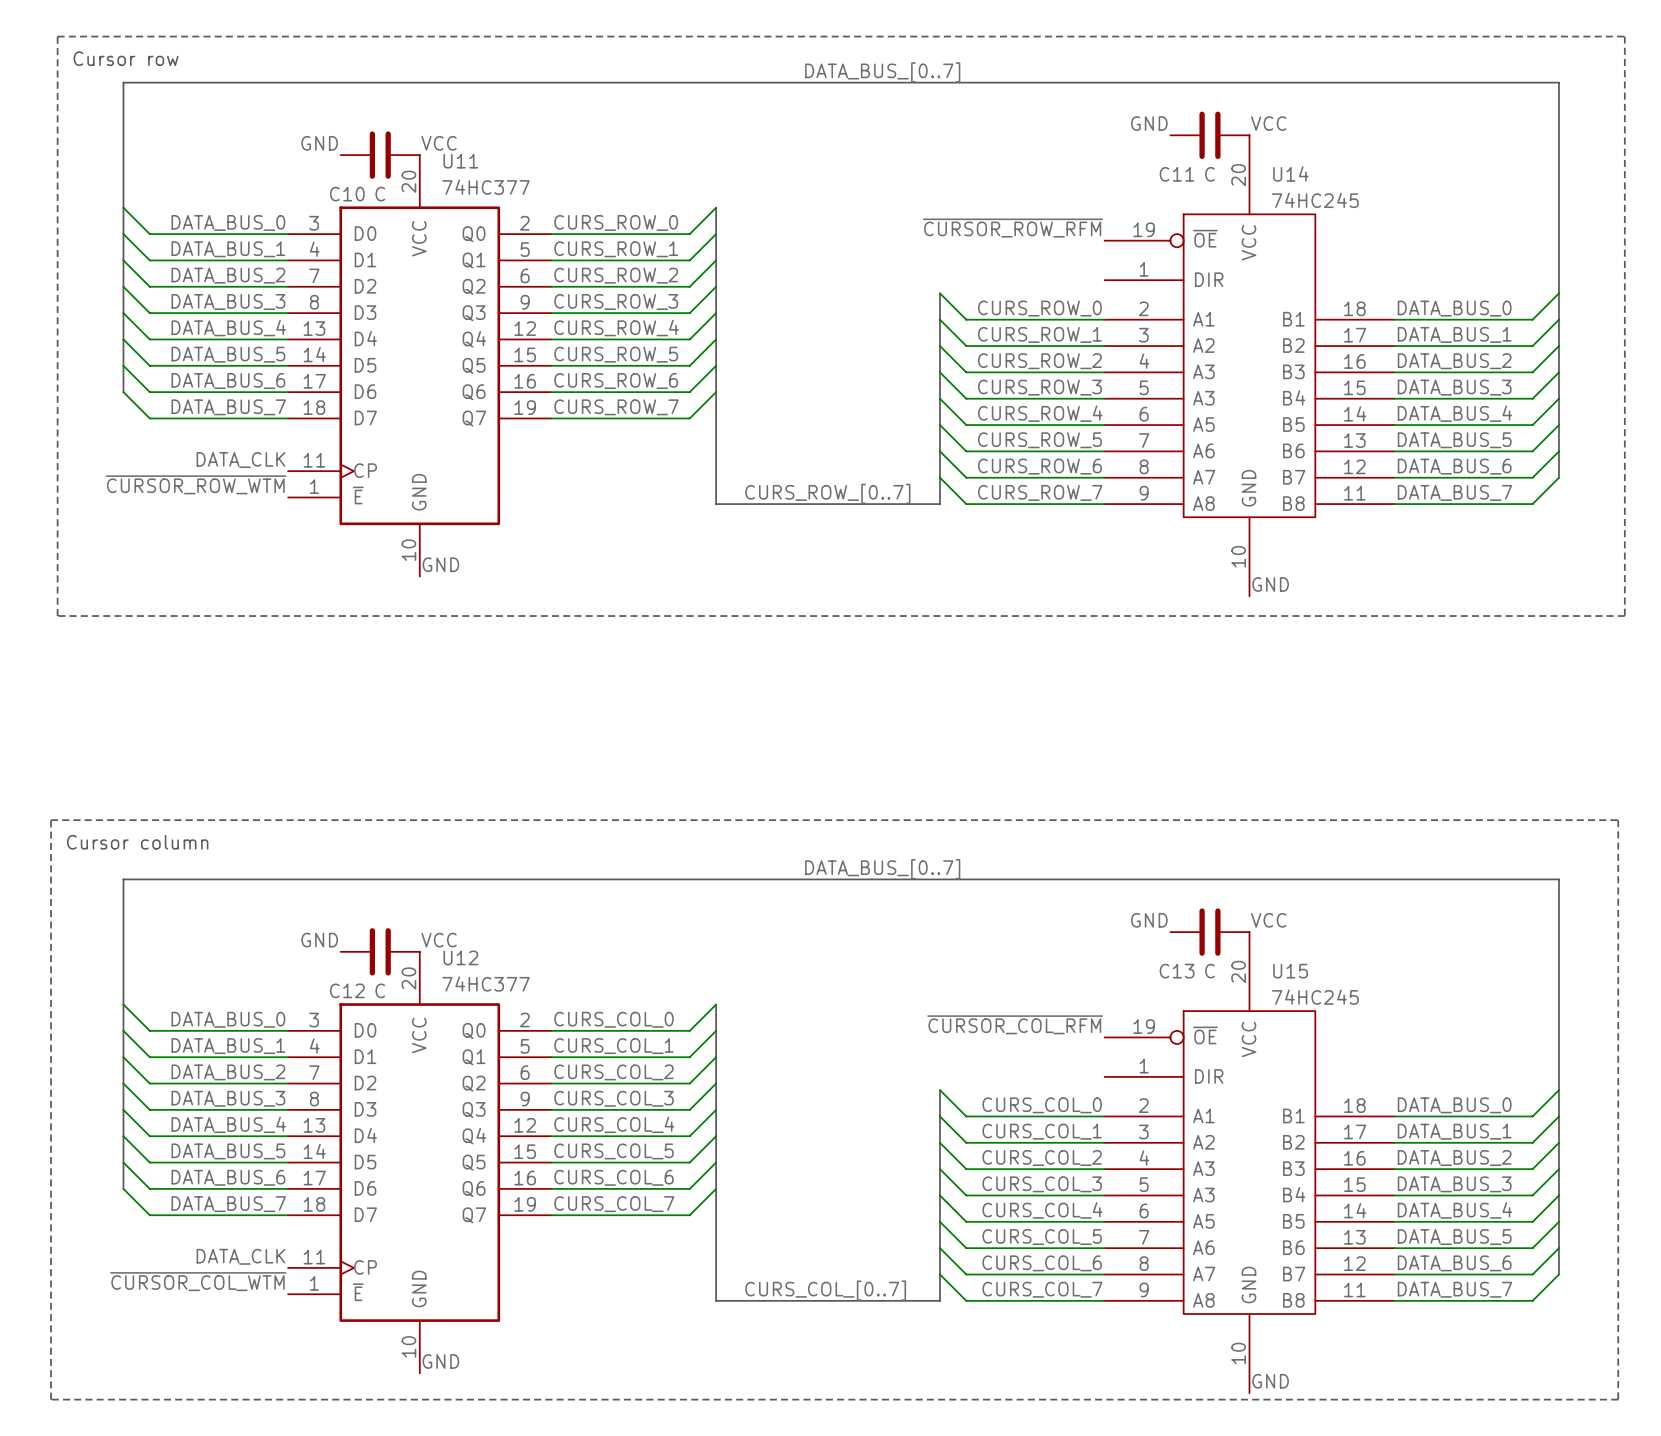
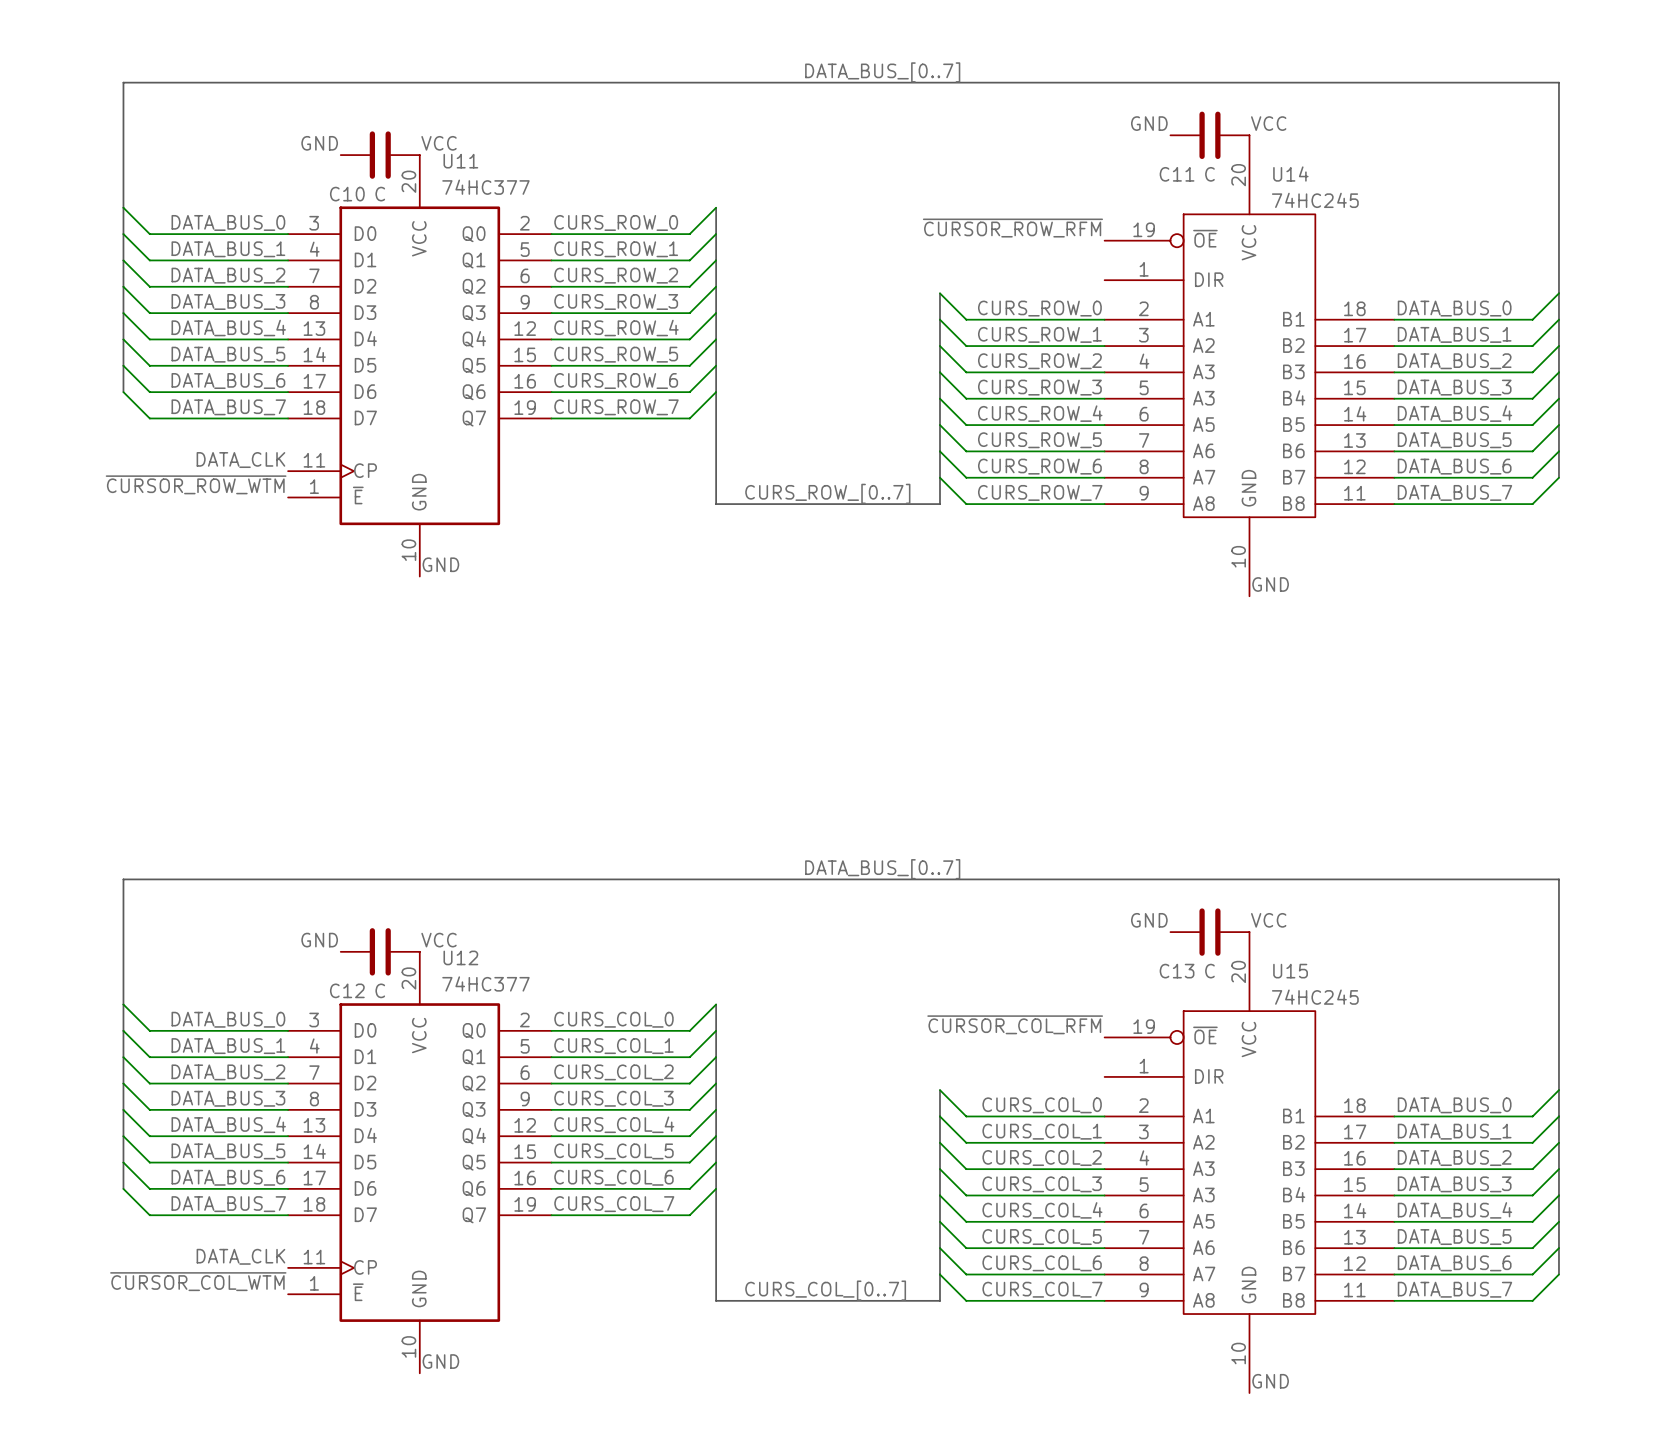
line: (57, 36) (1624, 36) (1624, 616) (57, 616) (57, 36) -> none
text: Cursor row (126, 58) -> none
line: (51, 820) (1618, 820) (1618, 1399) (51, 1399) (51, 820) -> none
text: Cursor column (137, 842) -> none

